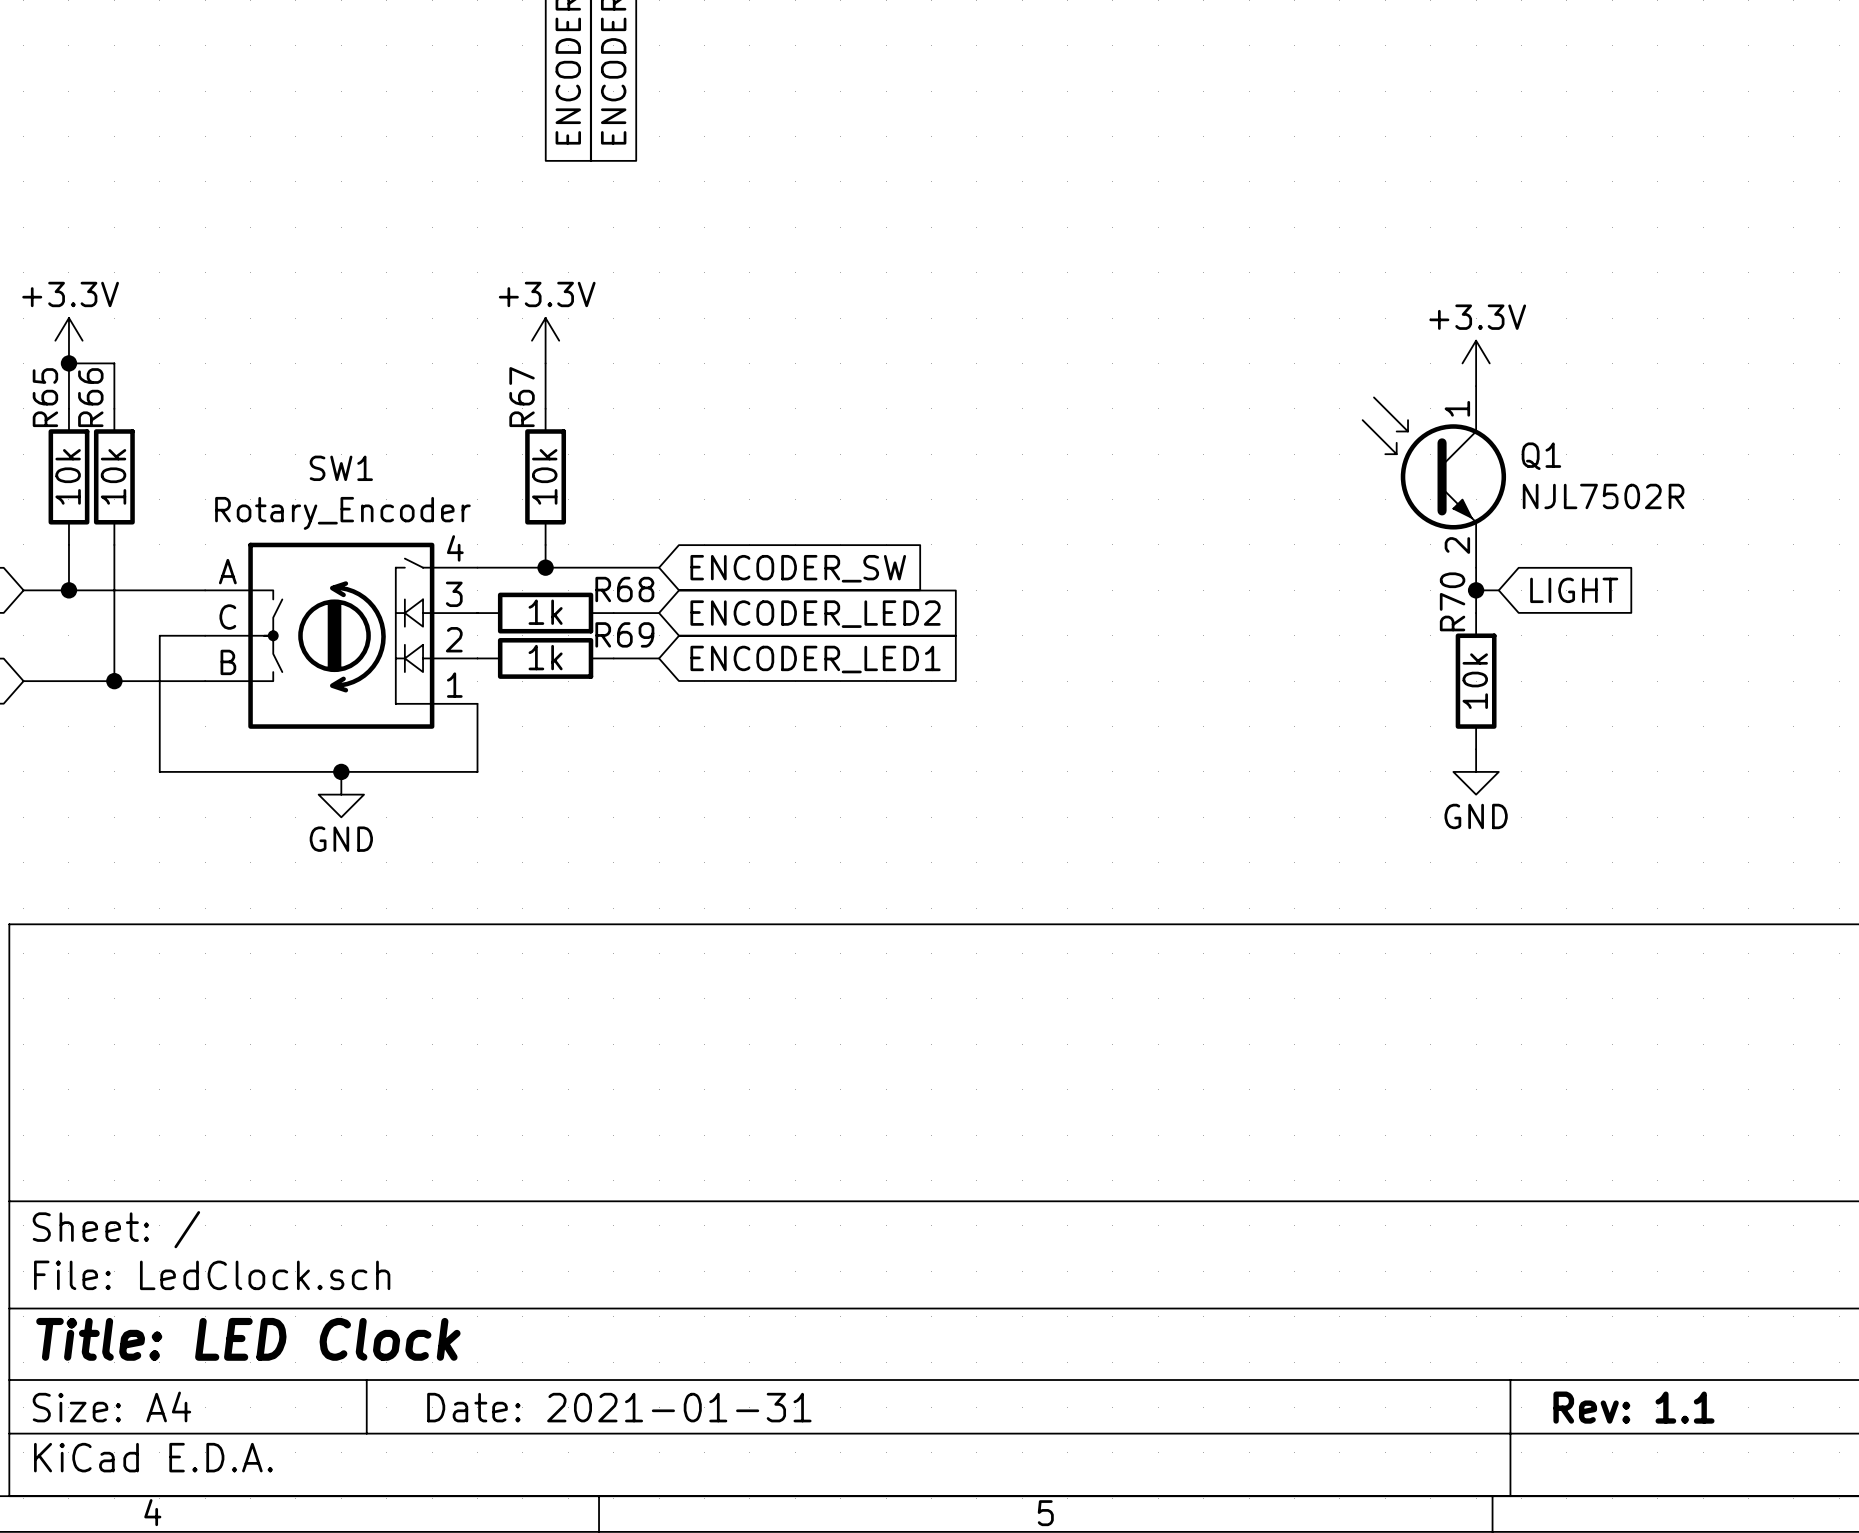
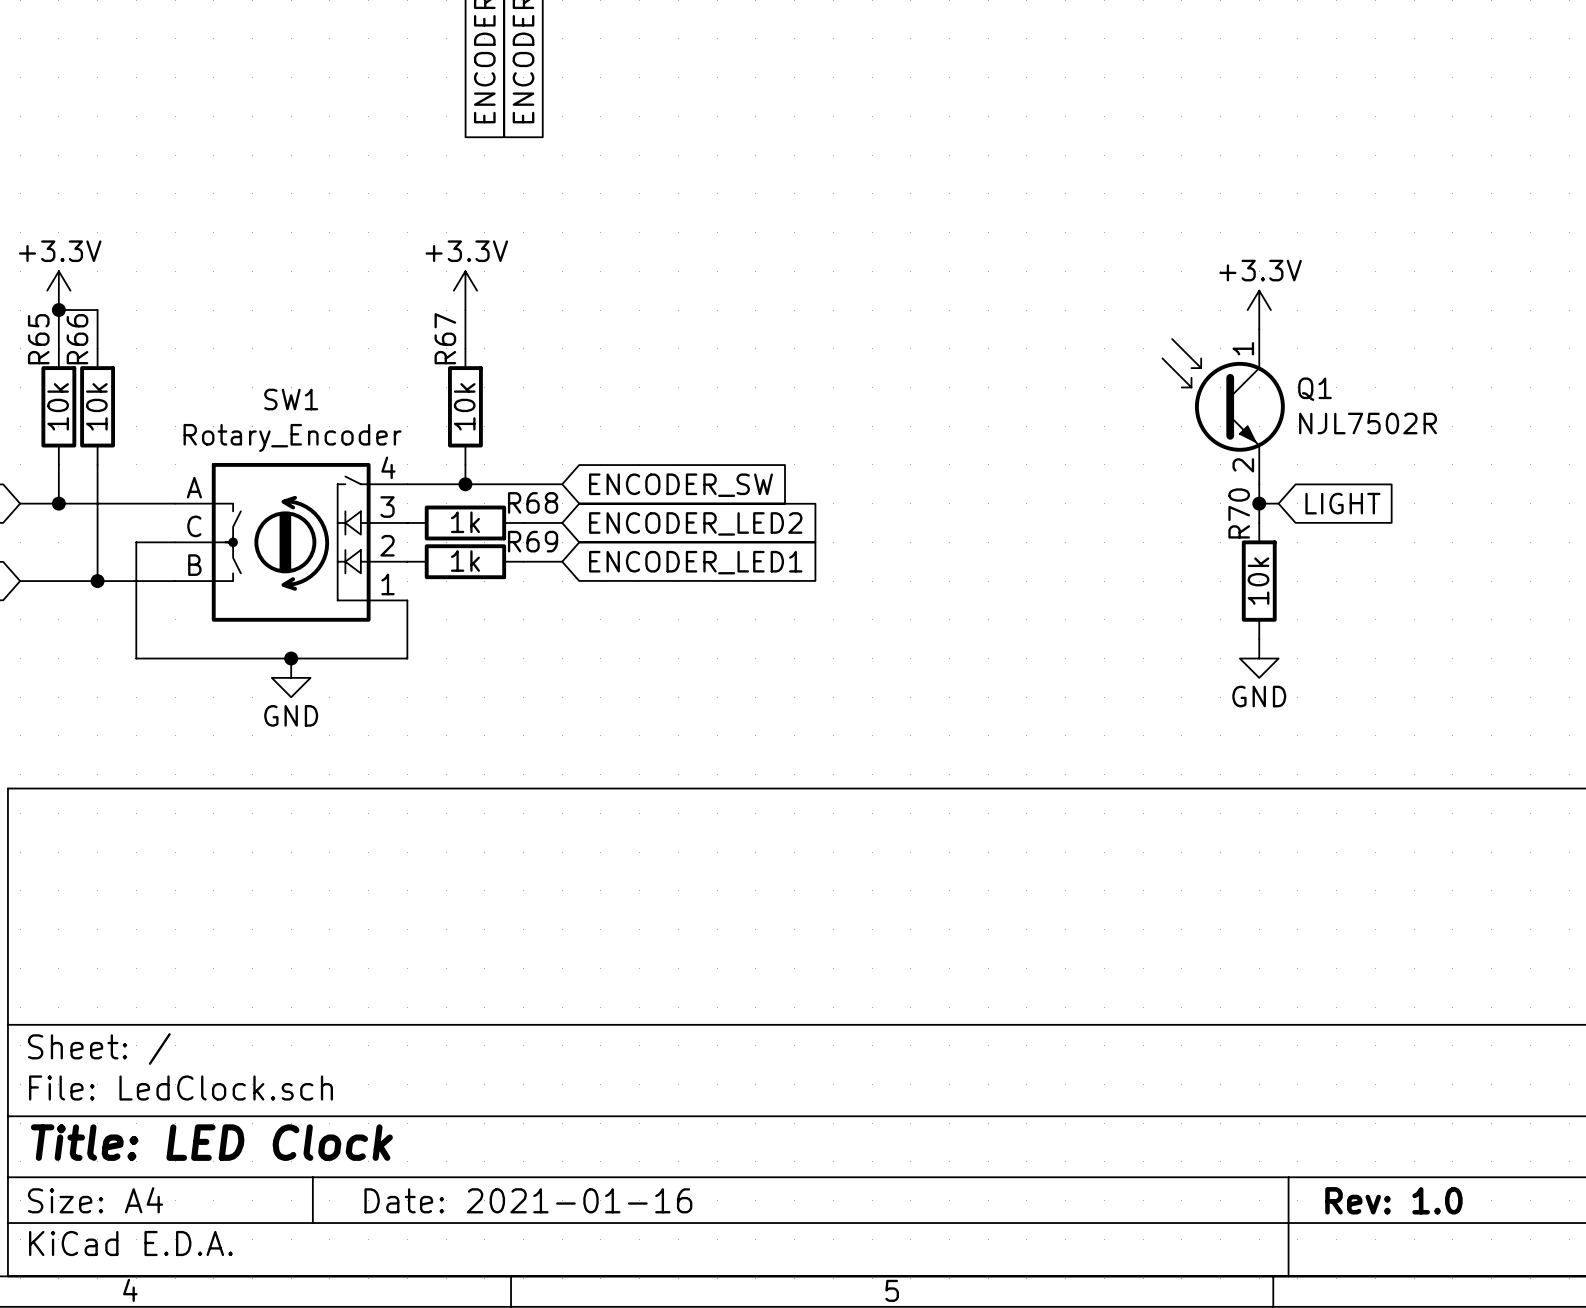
title block: Date: 2021-01-31 (619, 1407) -> Date: 2021-01-16 (528, 1200)
title block: Rev: 1.1 (1633, 1407) -> Rev: 1.0 (1393, 1200)

